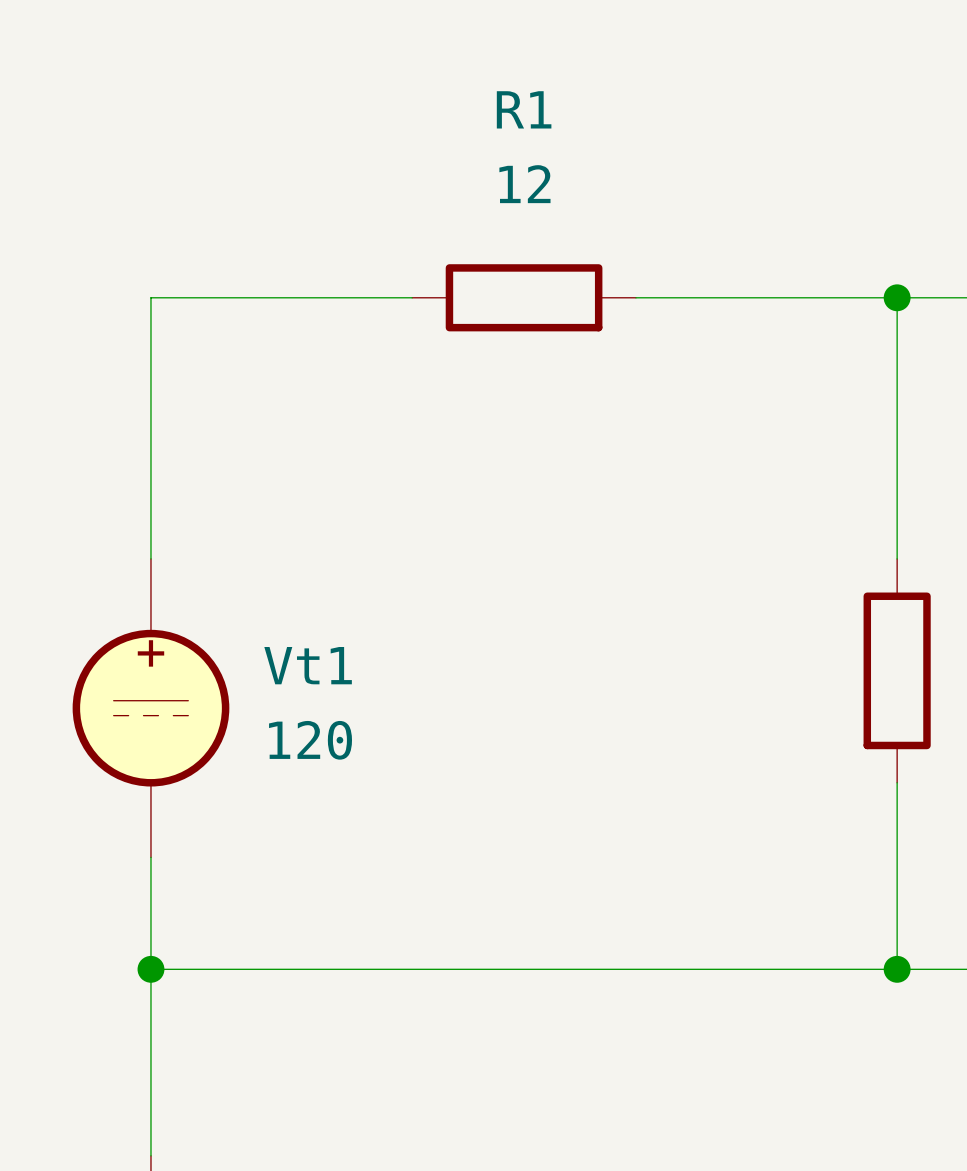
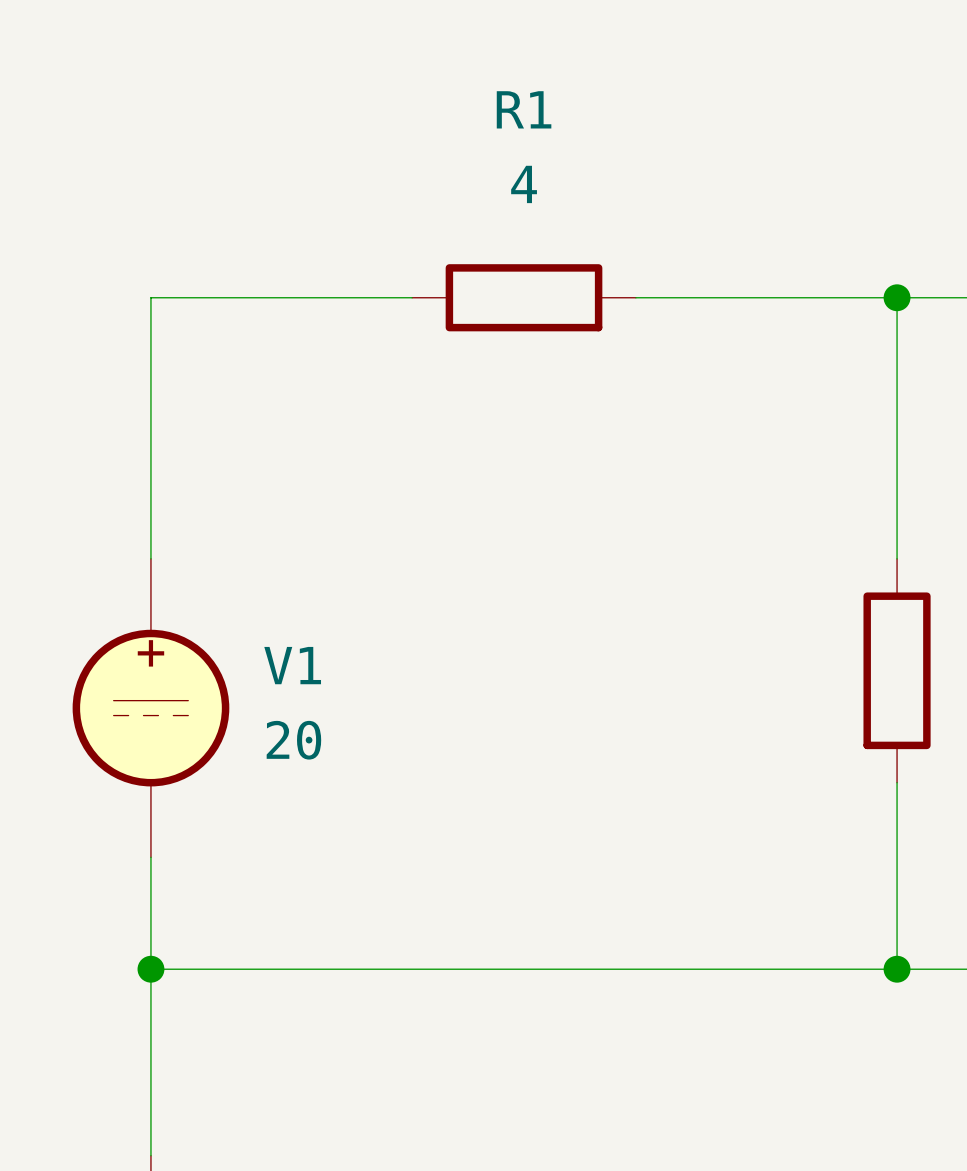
R1 value: 12 (524, 184) -> 4 (524, 184)
Vt1 name: Vt1 (308, 665) -> V1 (292, 665)
Vt1 value: 120 (310, 740) -> 20 (293, 740)

